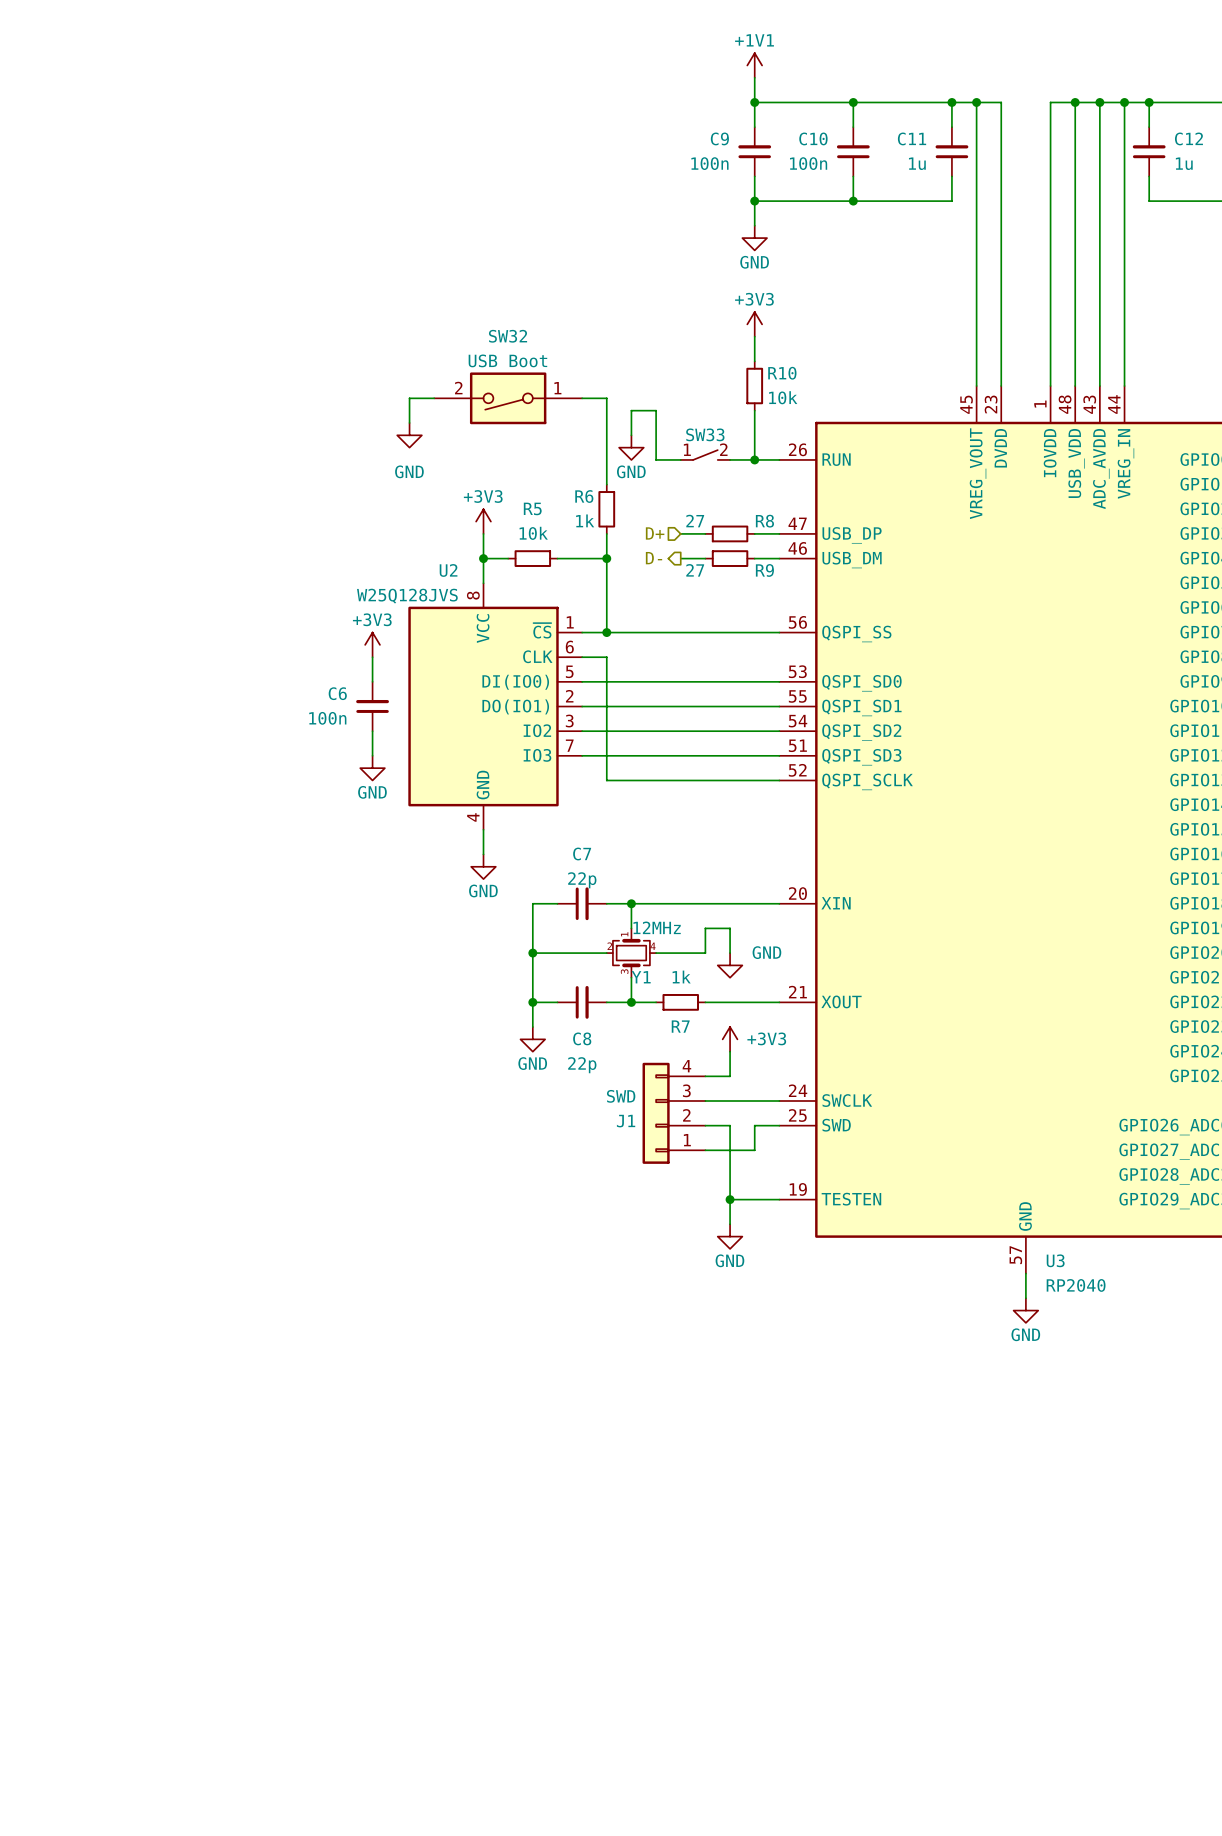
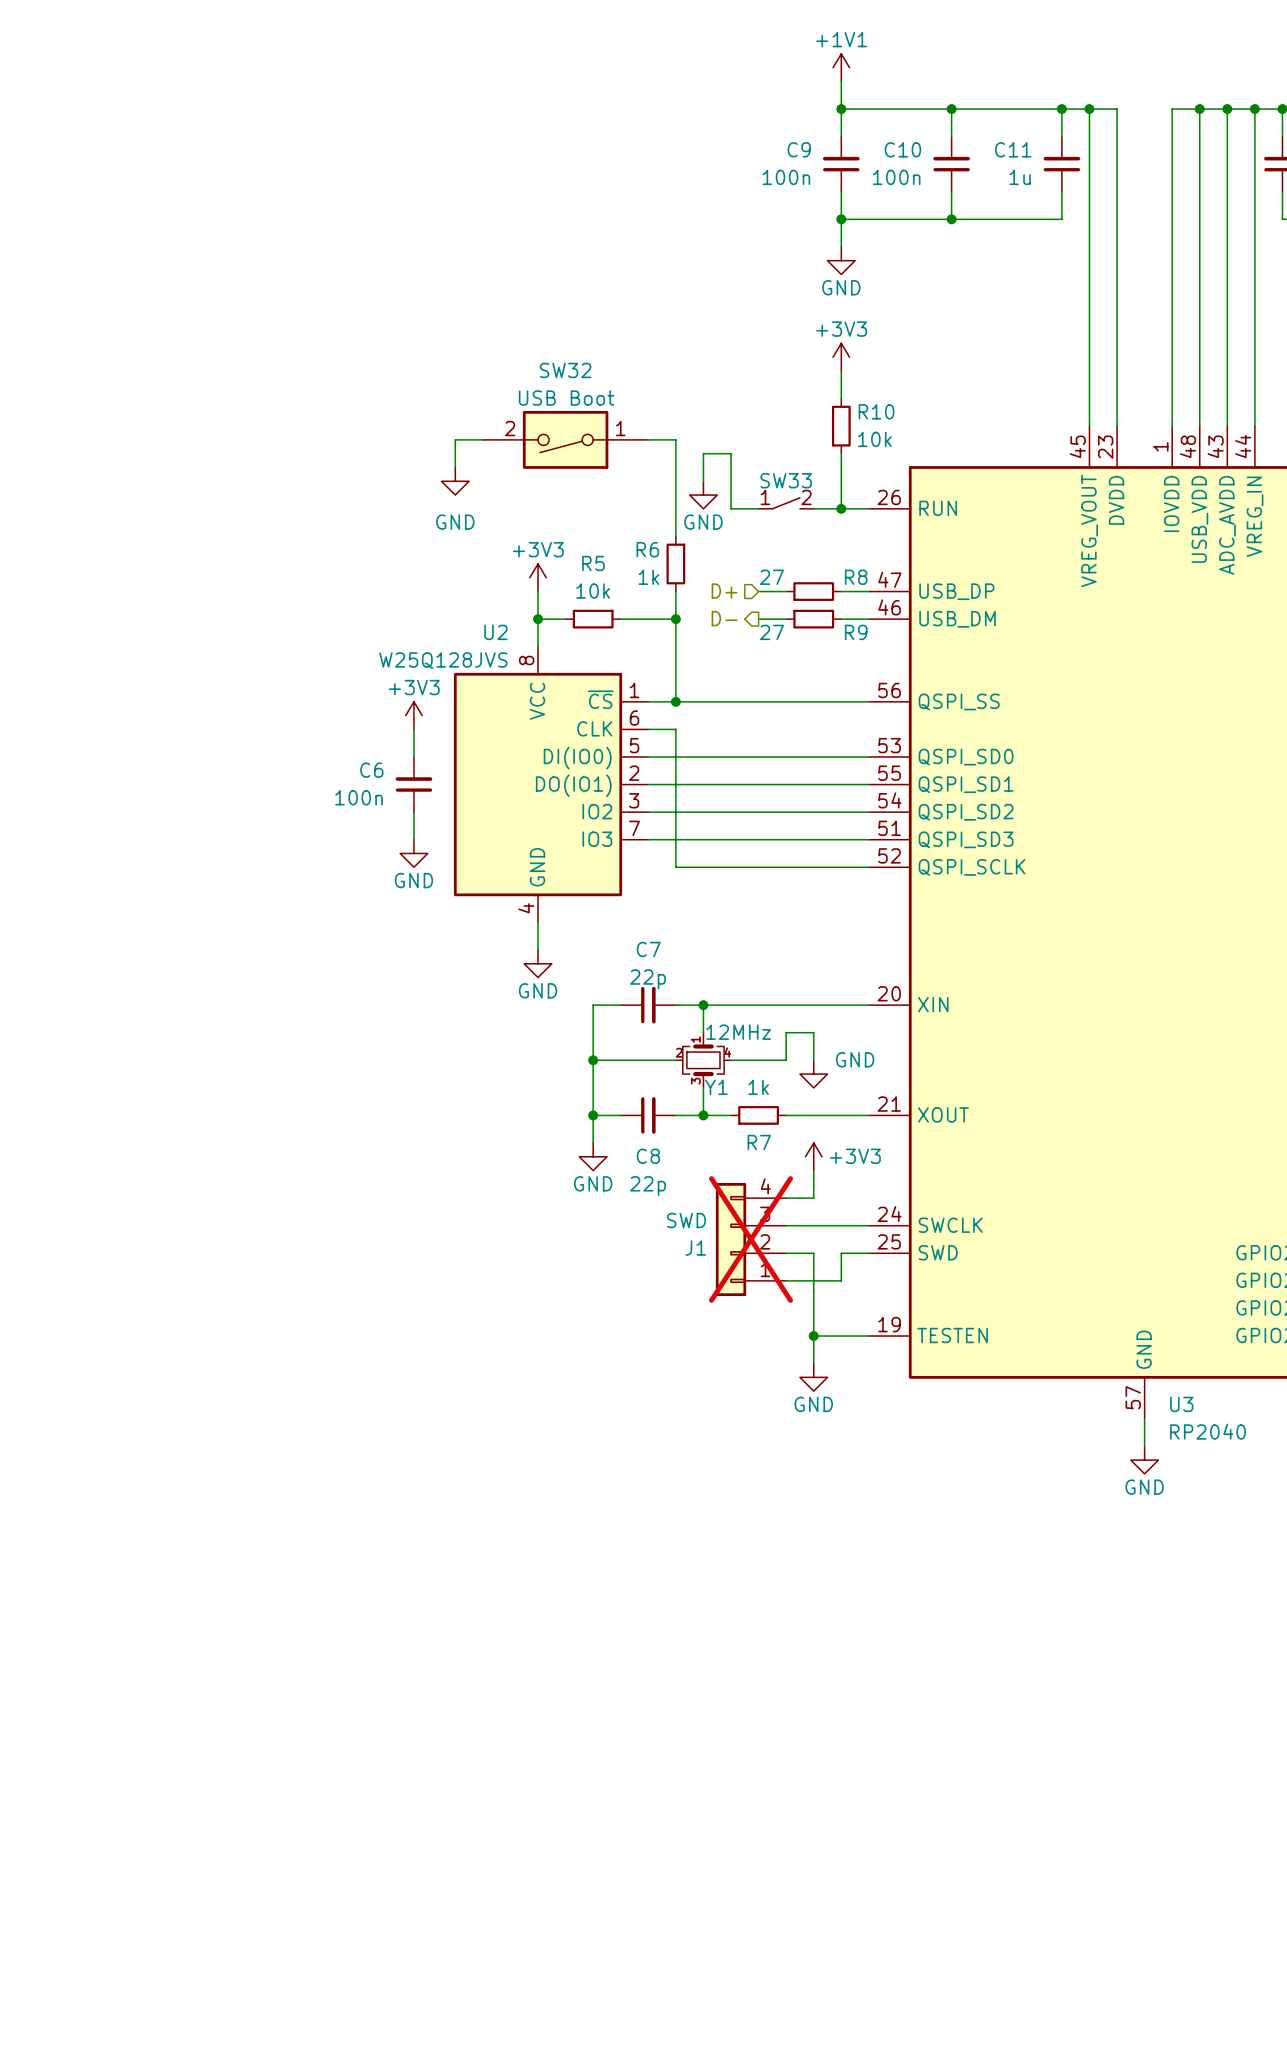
J1 do-not-place cross: none -> (751, 1239)

